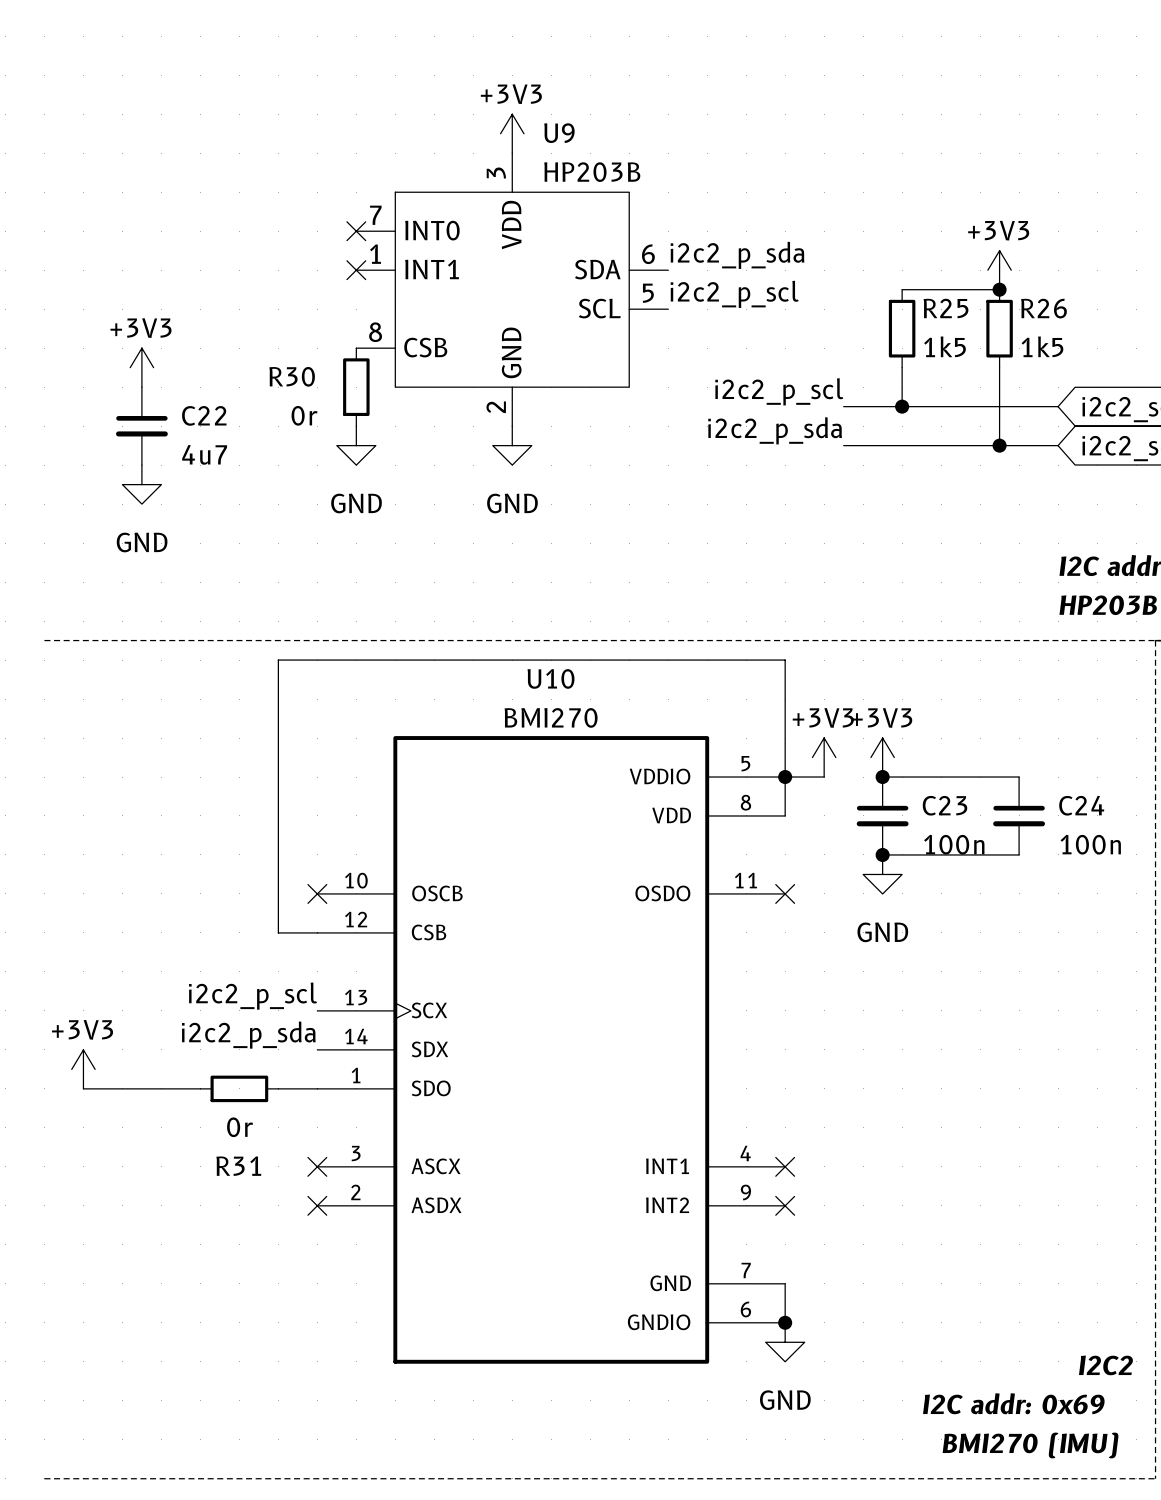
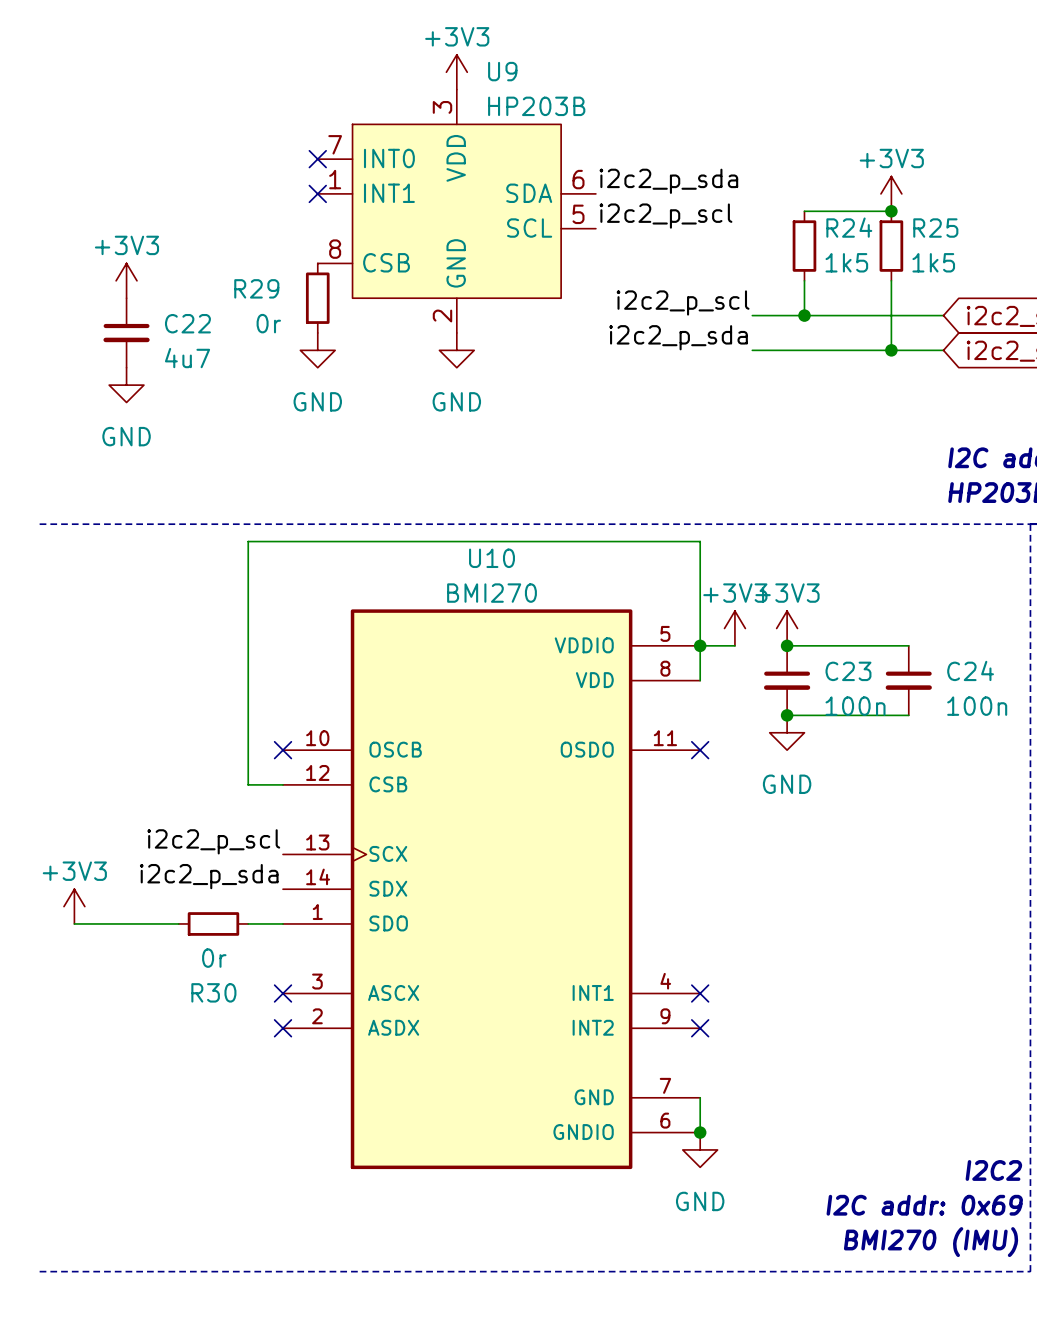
R25 name: R25 (946, 308) -> R24 (849, 227)
R26 name: R26 (1043, 308) -> R25 (935, 228)
R30 name: R30 (292, 376) -> R29 (256, 288)
R31 name: R31 (238, 1166) -> R30 (213, 992)

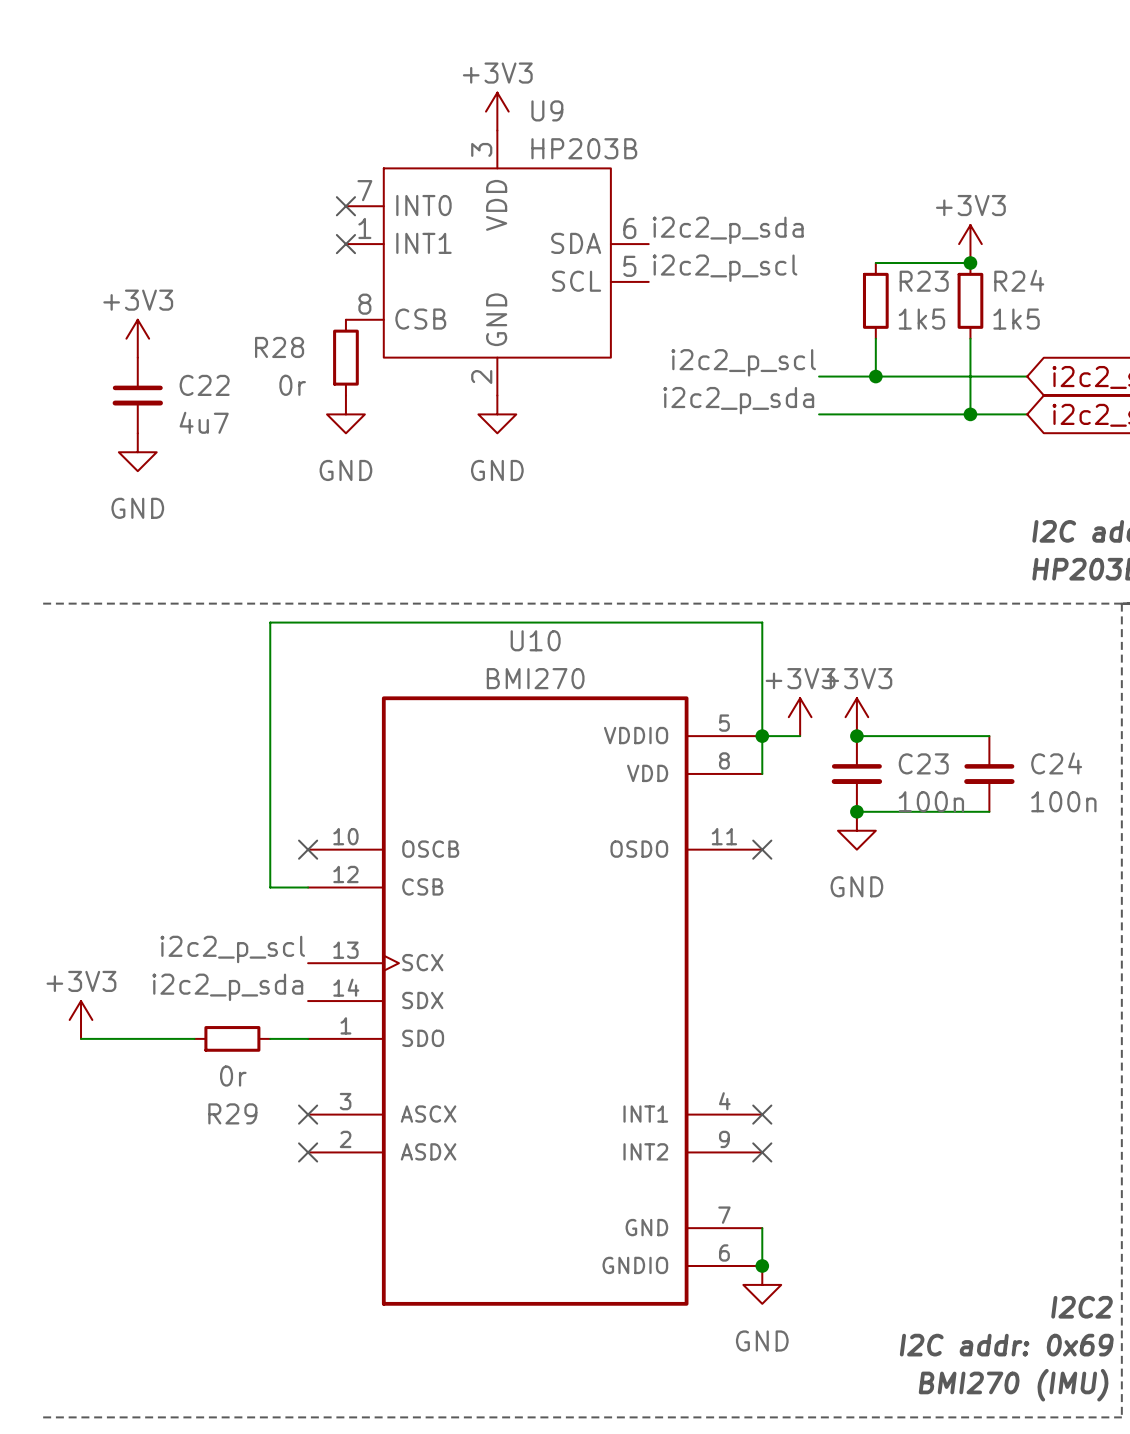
R24 name: R24 (849, 227) -> R23 (924, 281)
R25 name: R25 (935, 228) -> R24 (1019, 280)
R29 name: R29 (256, 288) -> R28 (279, 347)
R30 name: R30 (213, 992) -> R29 (232, 1113)

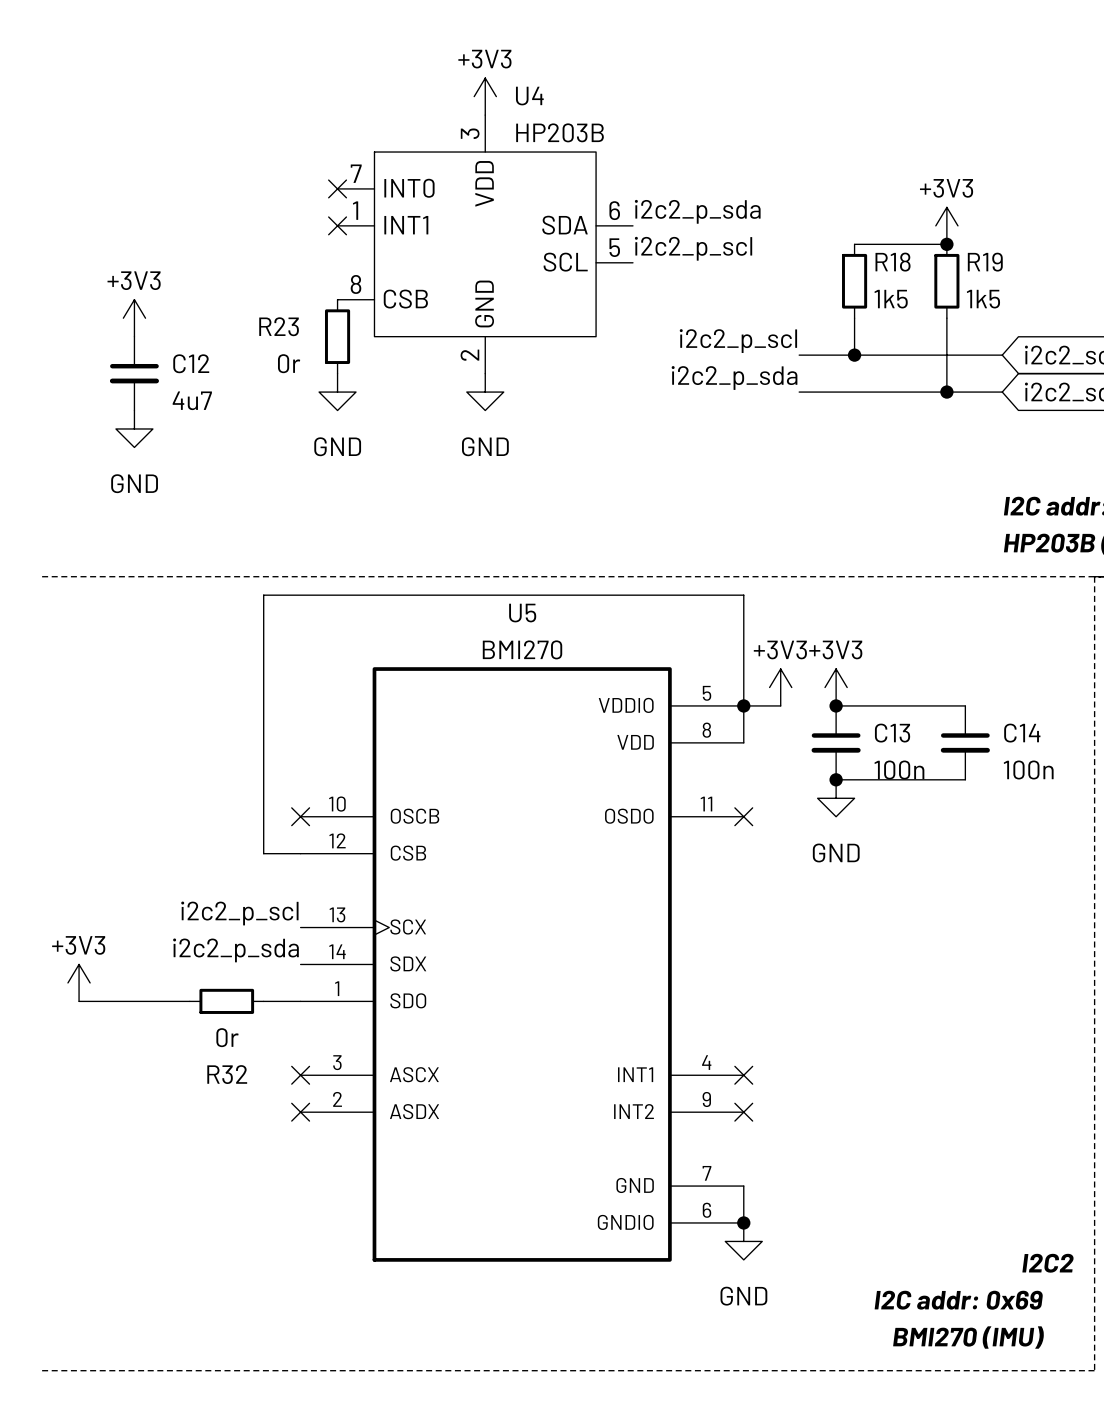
U9 name: U9 (547, 110) -> U4 (529, 96)
R24 name: R24 (1019, 280) -> R19 (985, 262)
R23 name: R23 (924, 281) -> R18 (893, 262)
R28 name: R28 (279, 347) -> R23 (279, 326)
C22 name: C22 (204, 385) -> C12 (191, 363)
U10 name: U10 (535, 640) -> U5 (522, 613)
C23 name: C23 (923, 763) -> C13 (892, 733)
C24 name: C24 (1056, 763) -> C14 (1022, 733)
R29 name: R29 (232, 1113) -> R32 (227, 1074)

